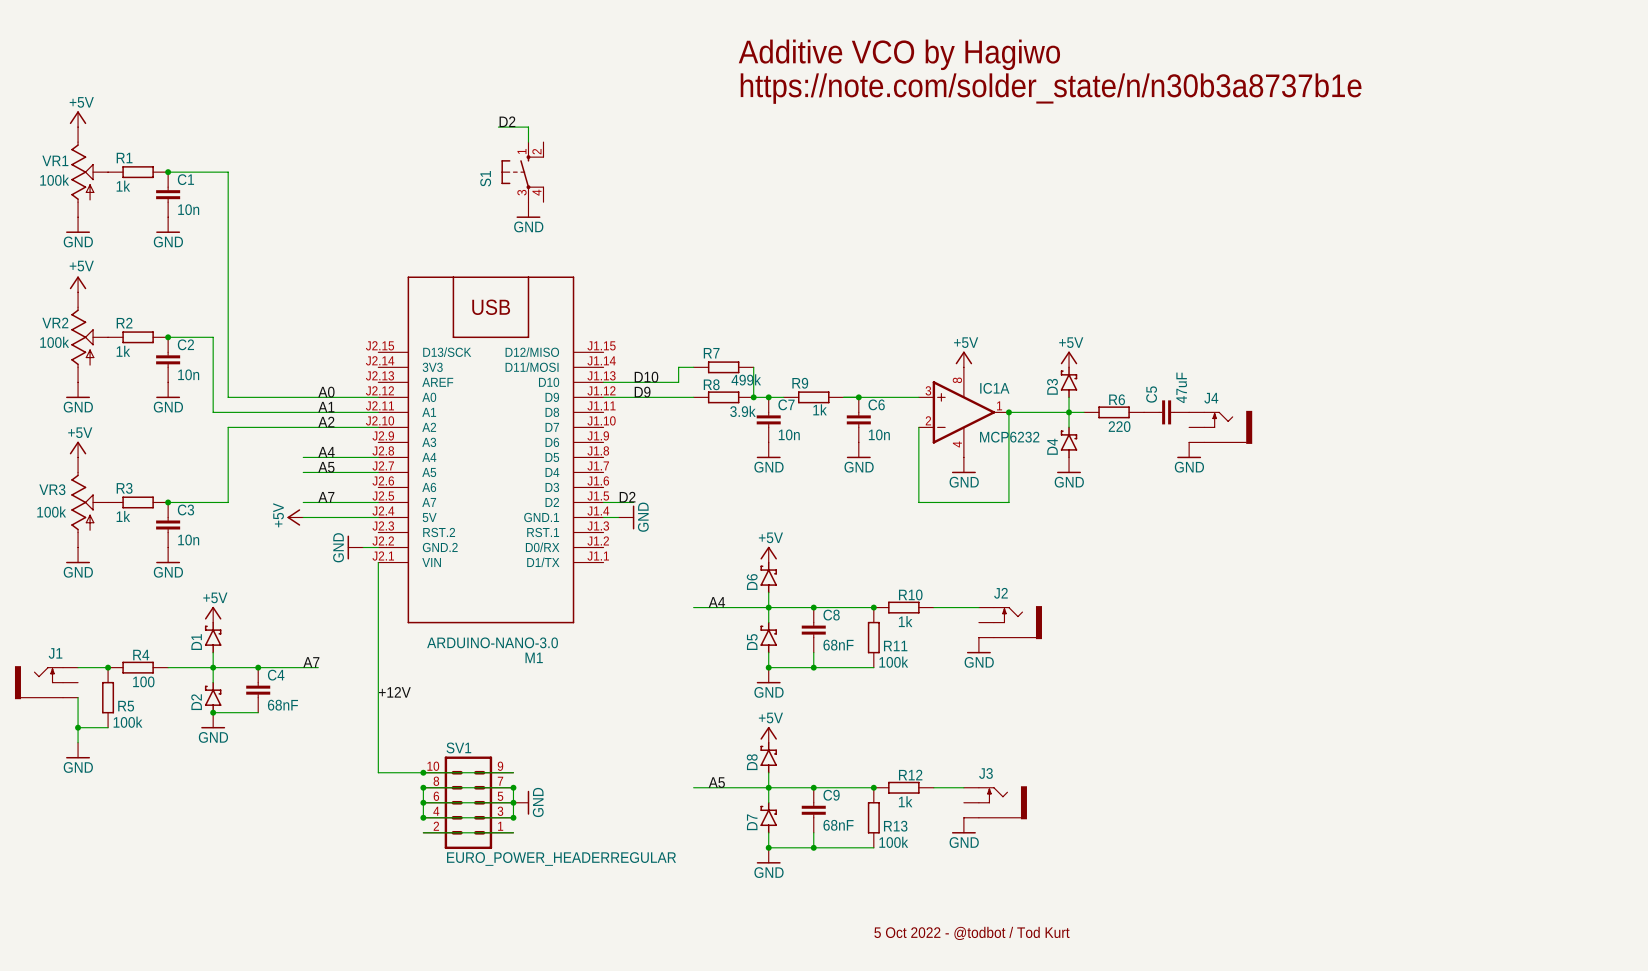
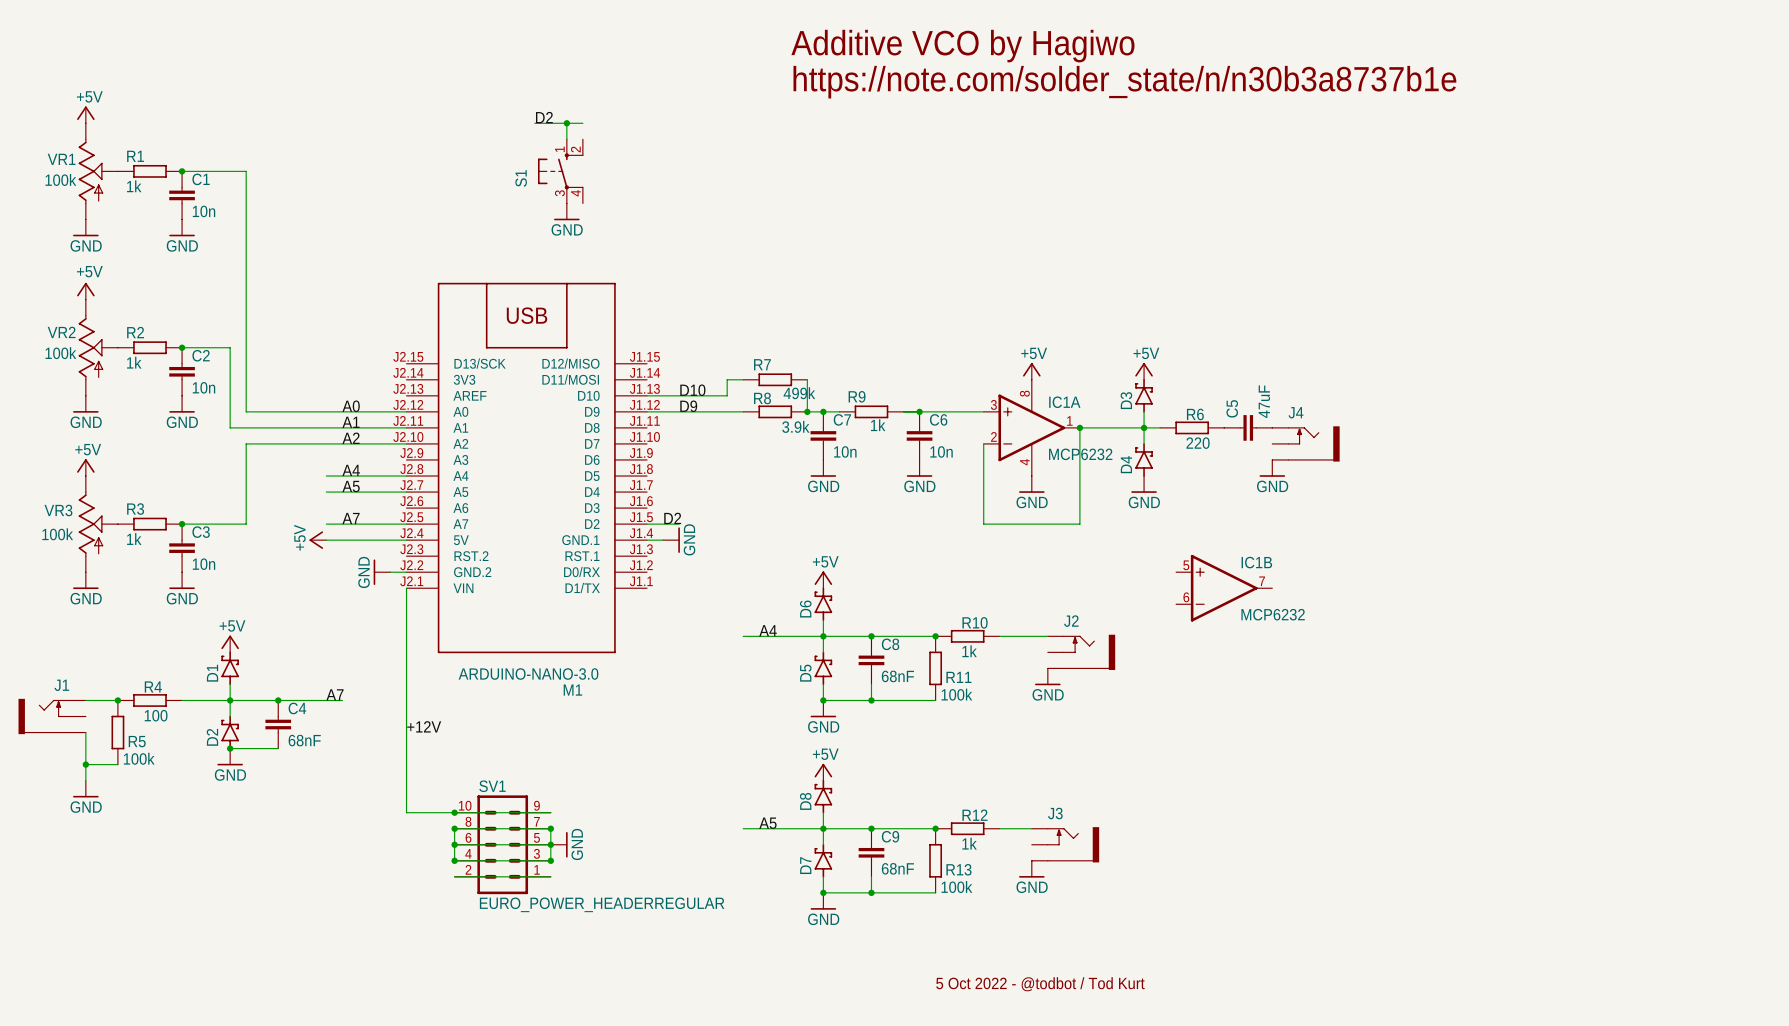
wire: none -> (566, 123) (582, 123)
junction: none -> (566, 123)
IC1B: none -> MCP6232 (1224, 588)

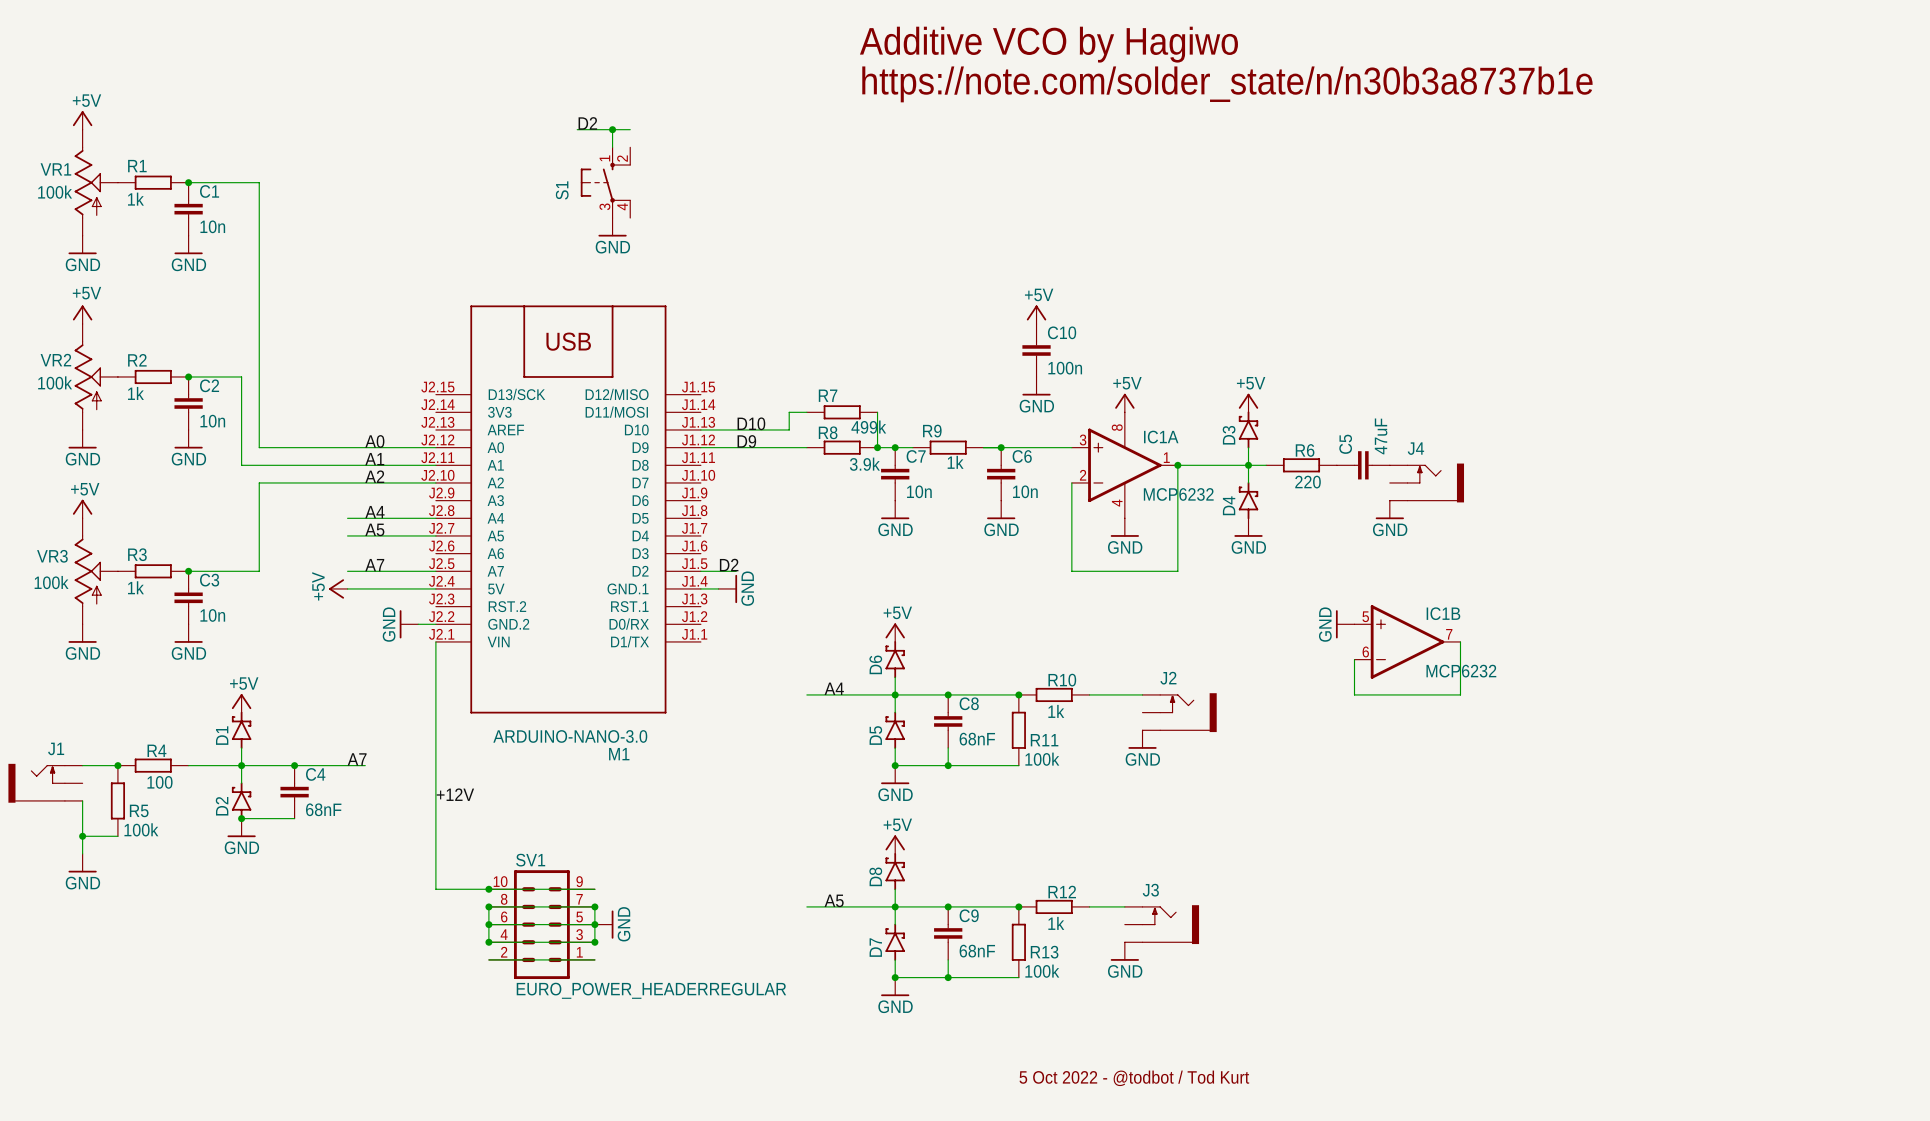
power symbol: none -> +5V (1036, 314)
C10: none -> 100n (1036, 350)
power symbol: none -> GND (1036, 386)
power symbol: none -> GND (1345, 624)
IC1B position: (1224, 588) -> (1407, 641)
wire: none -> (1460, 641) (1460, 694) (1354, 694) (1354, 659)

